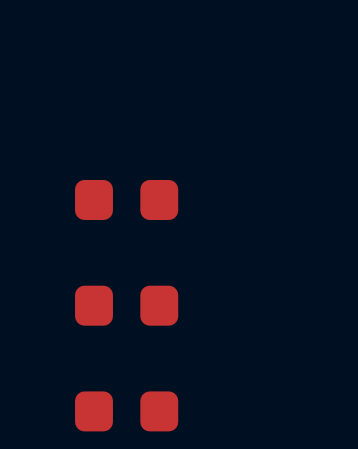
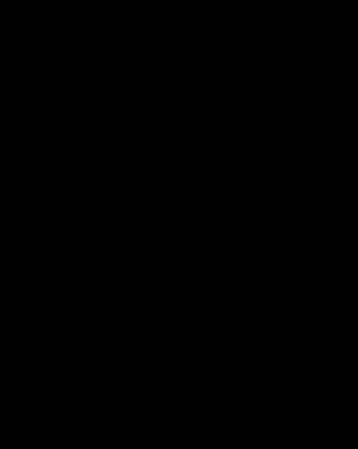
part: (126, 199) -> none
part: (126, 305) -> none
part: (126, 411) -> none

